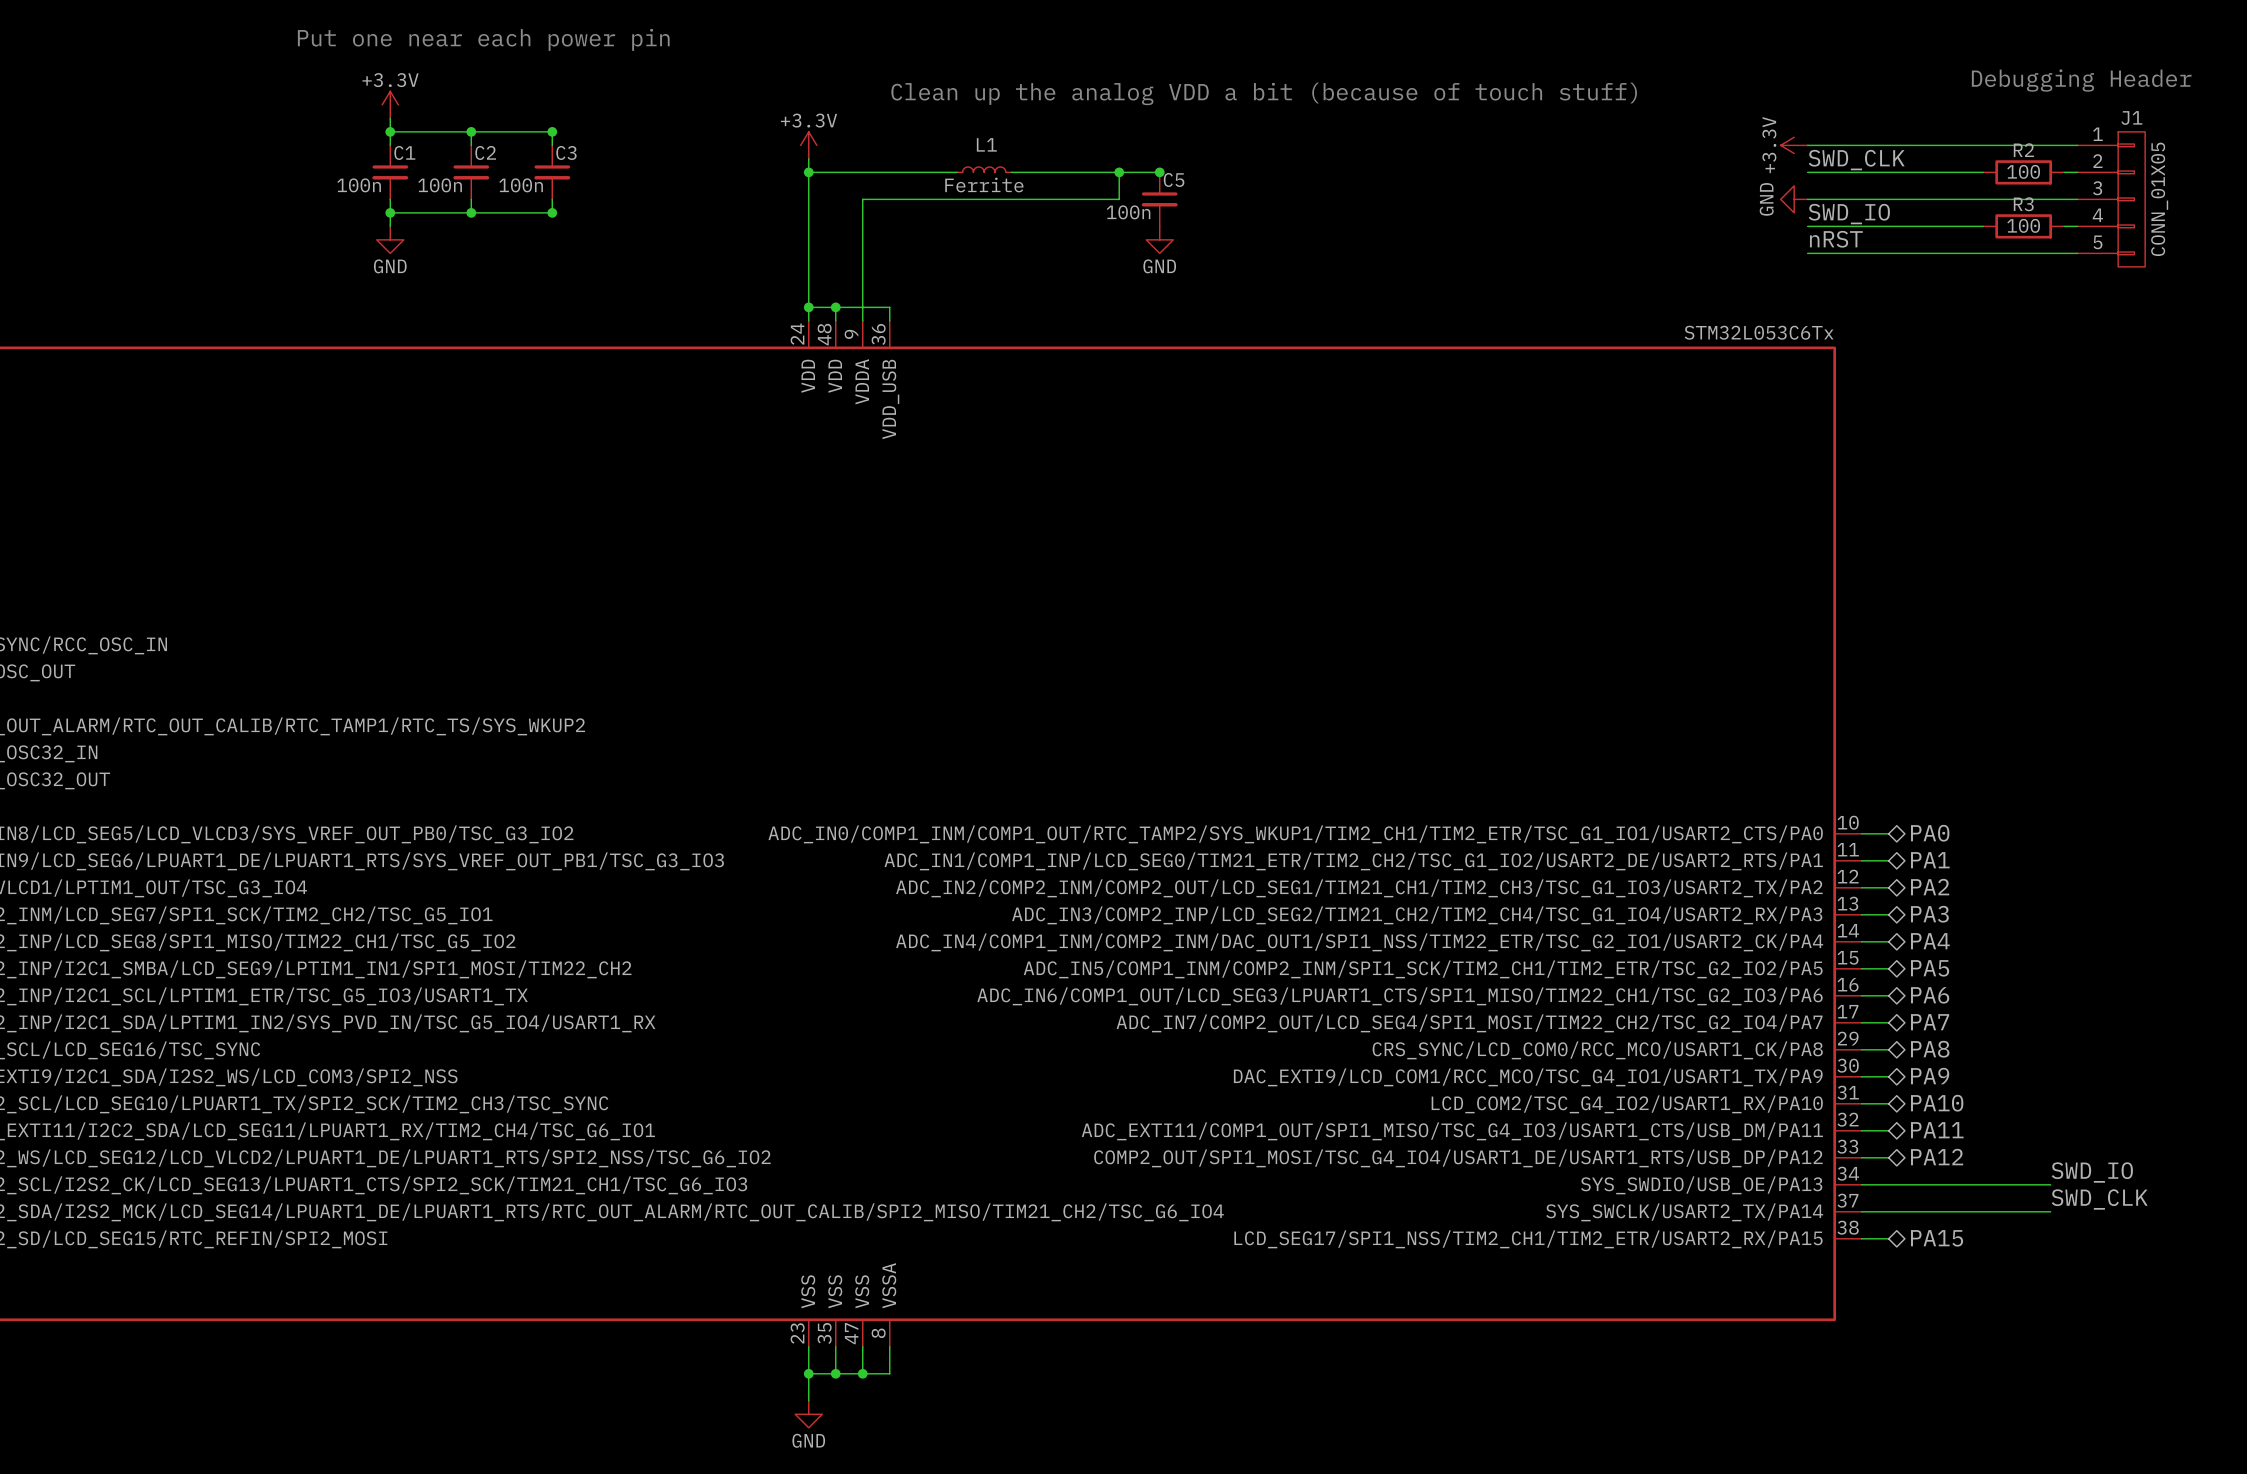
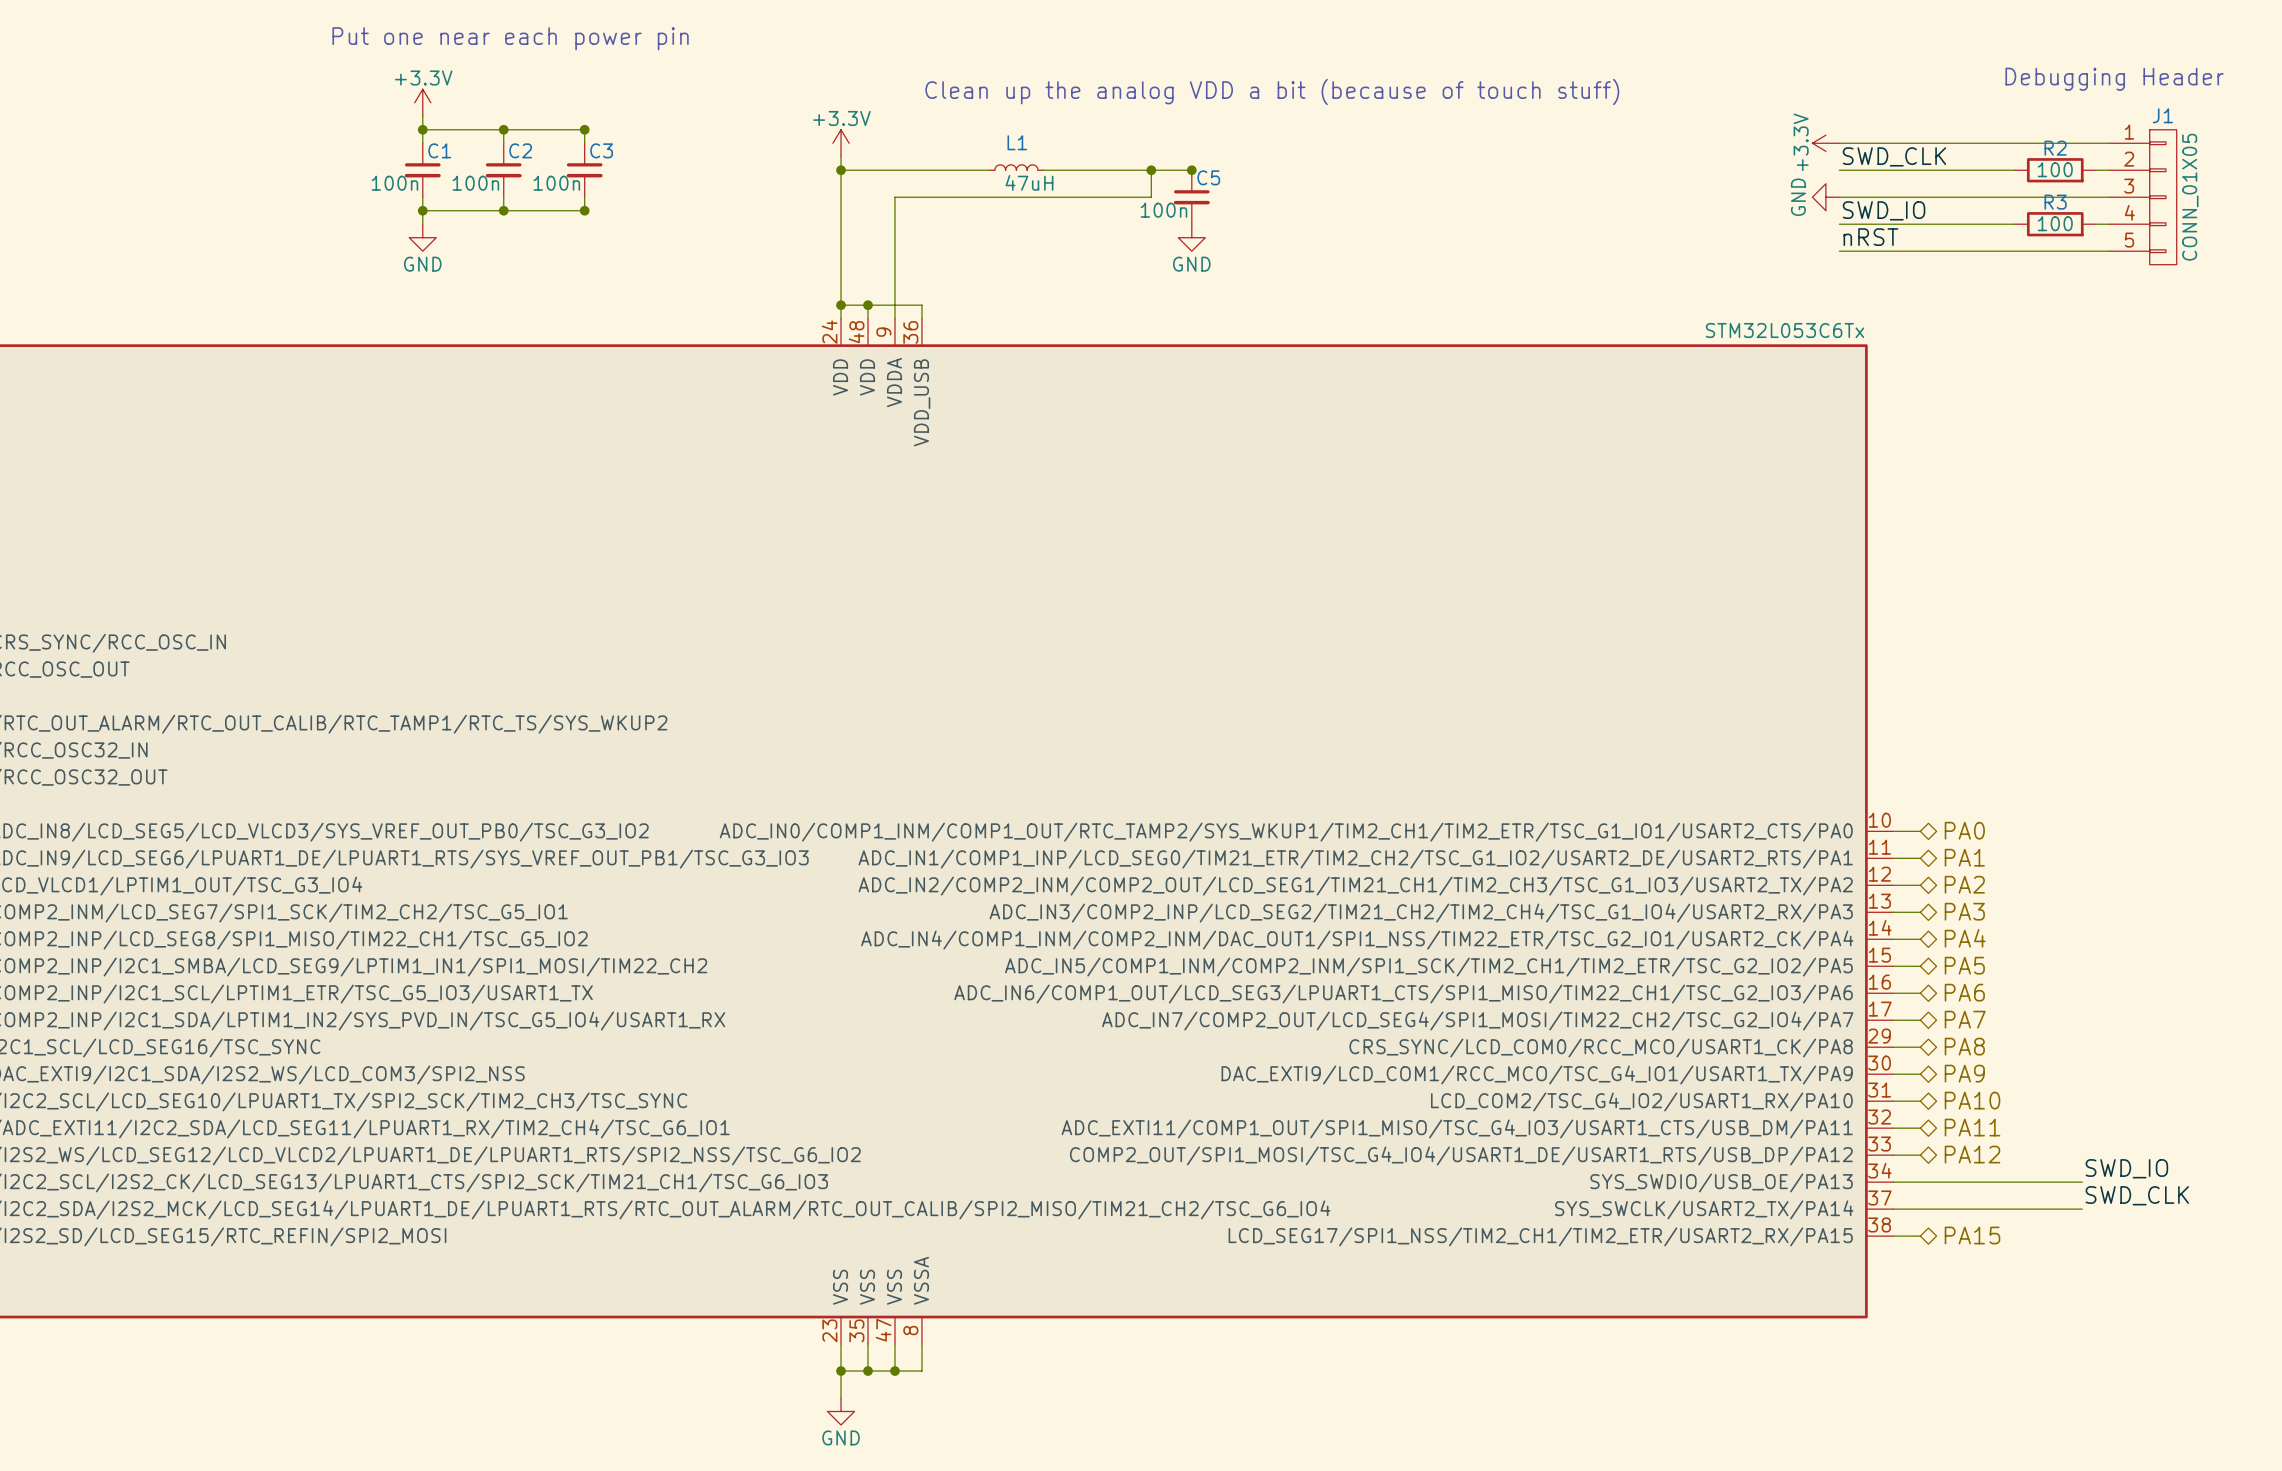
L1 value: Ferrite (984, 185) -> 47uH (1029, 182)

